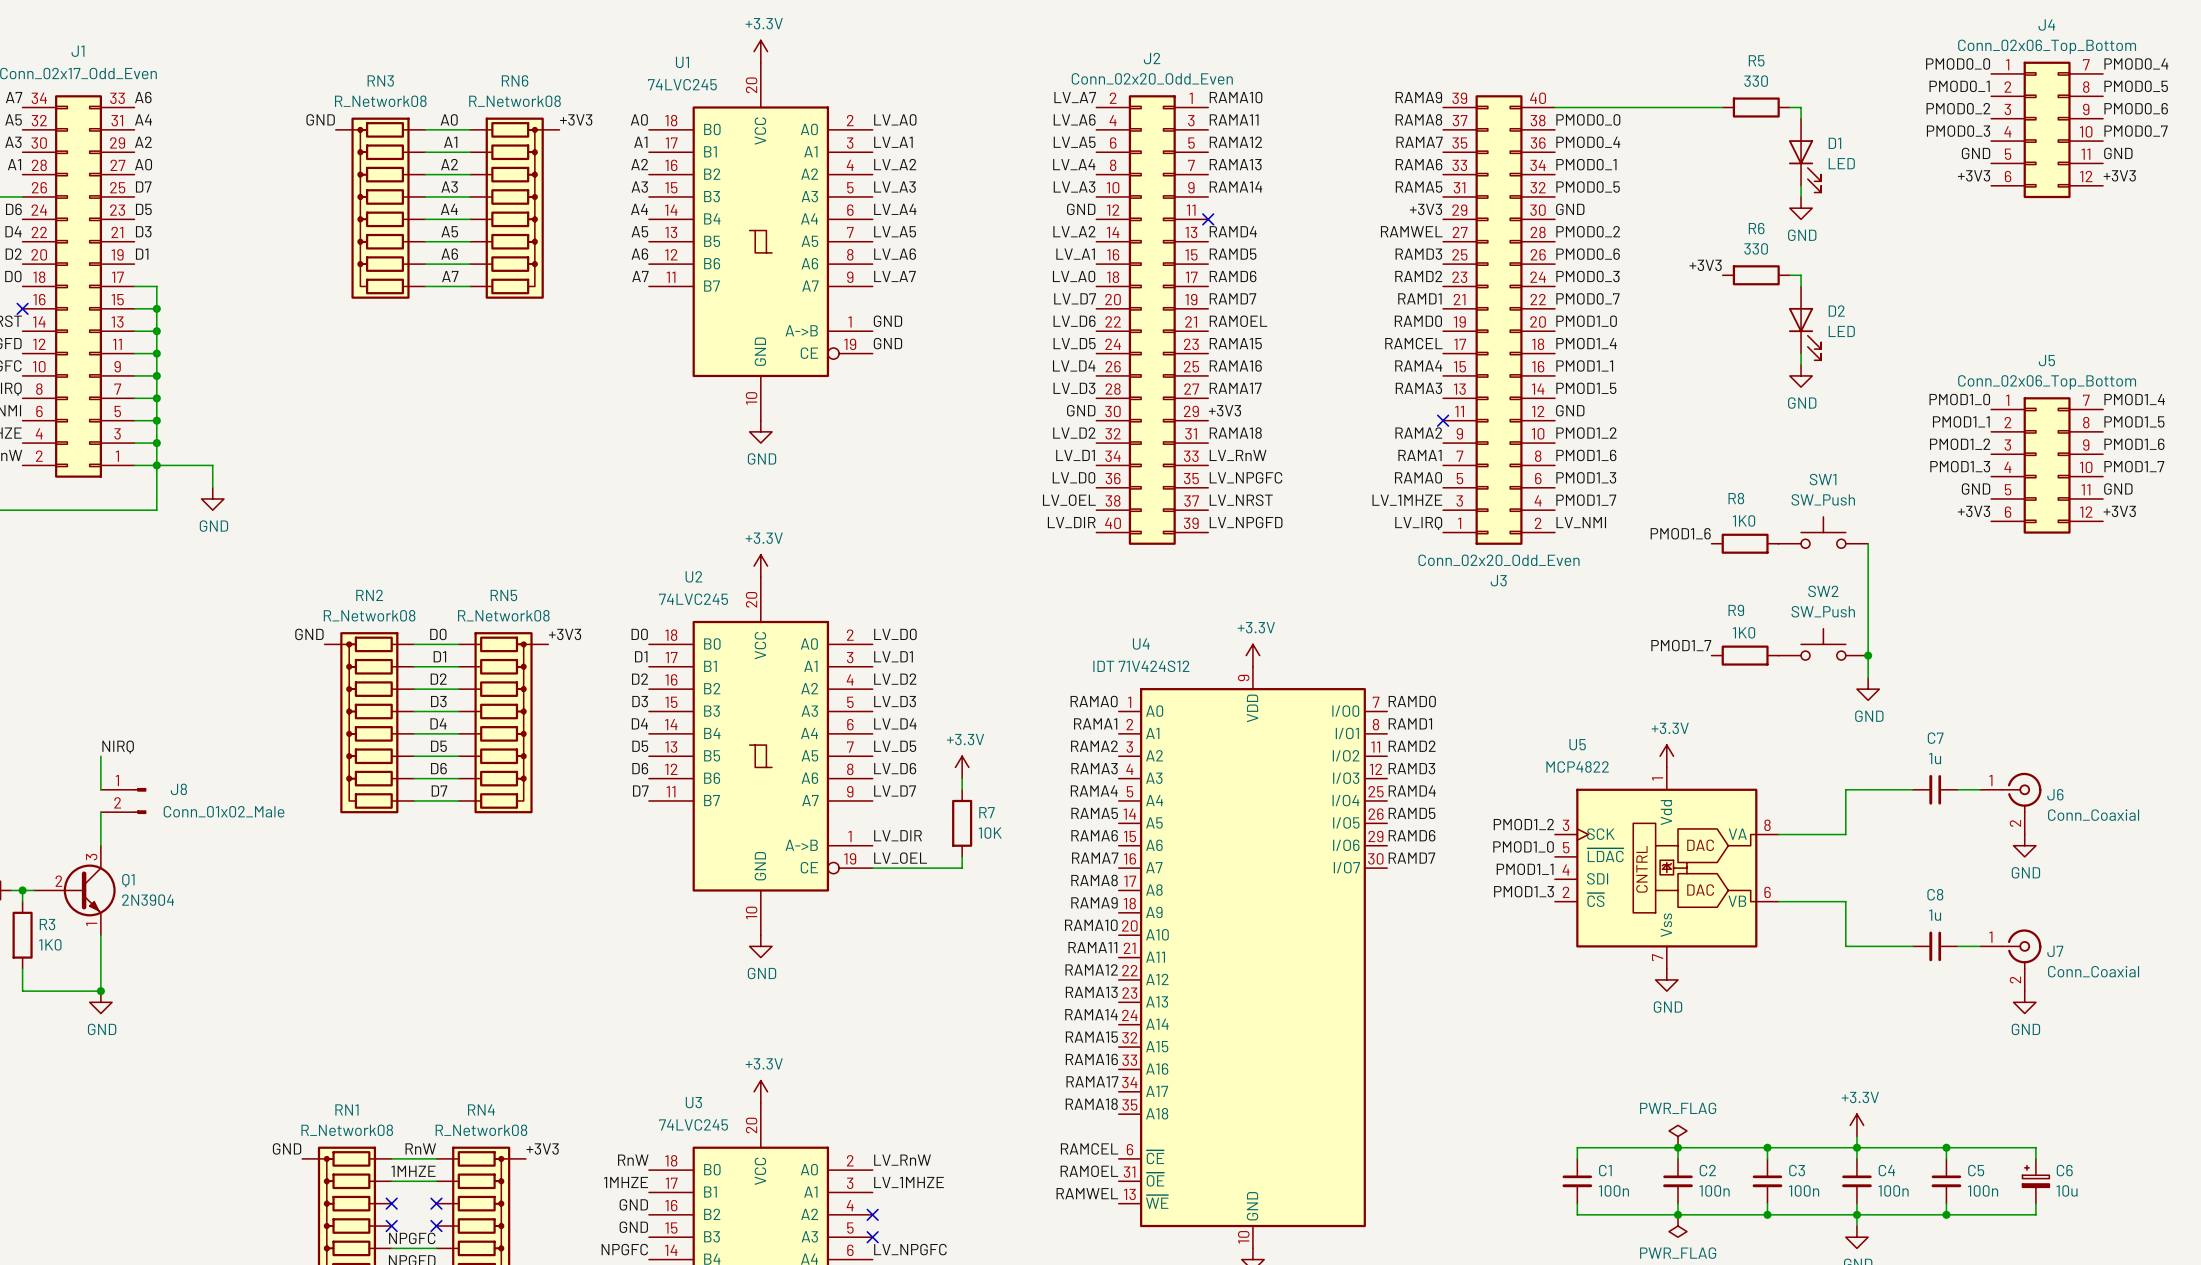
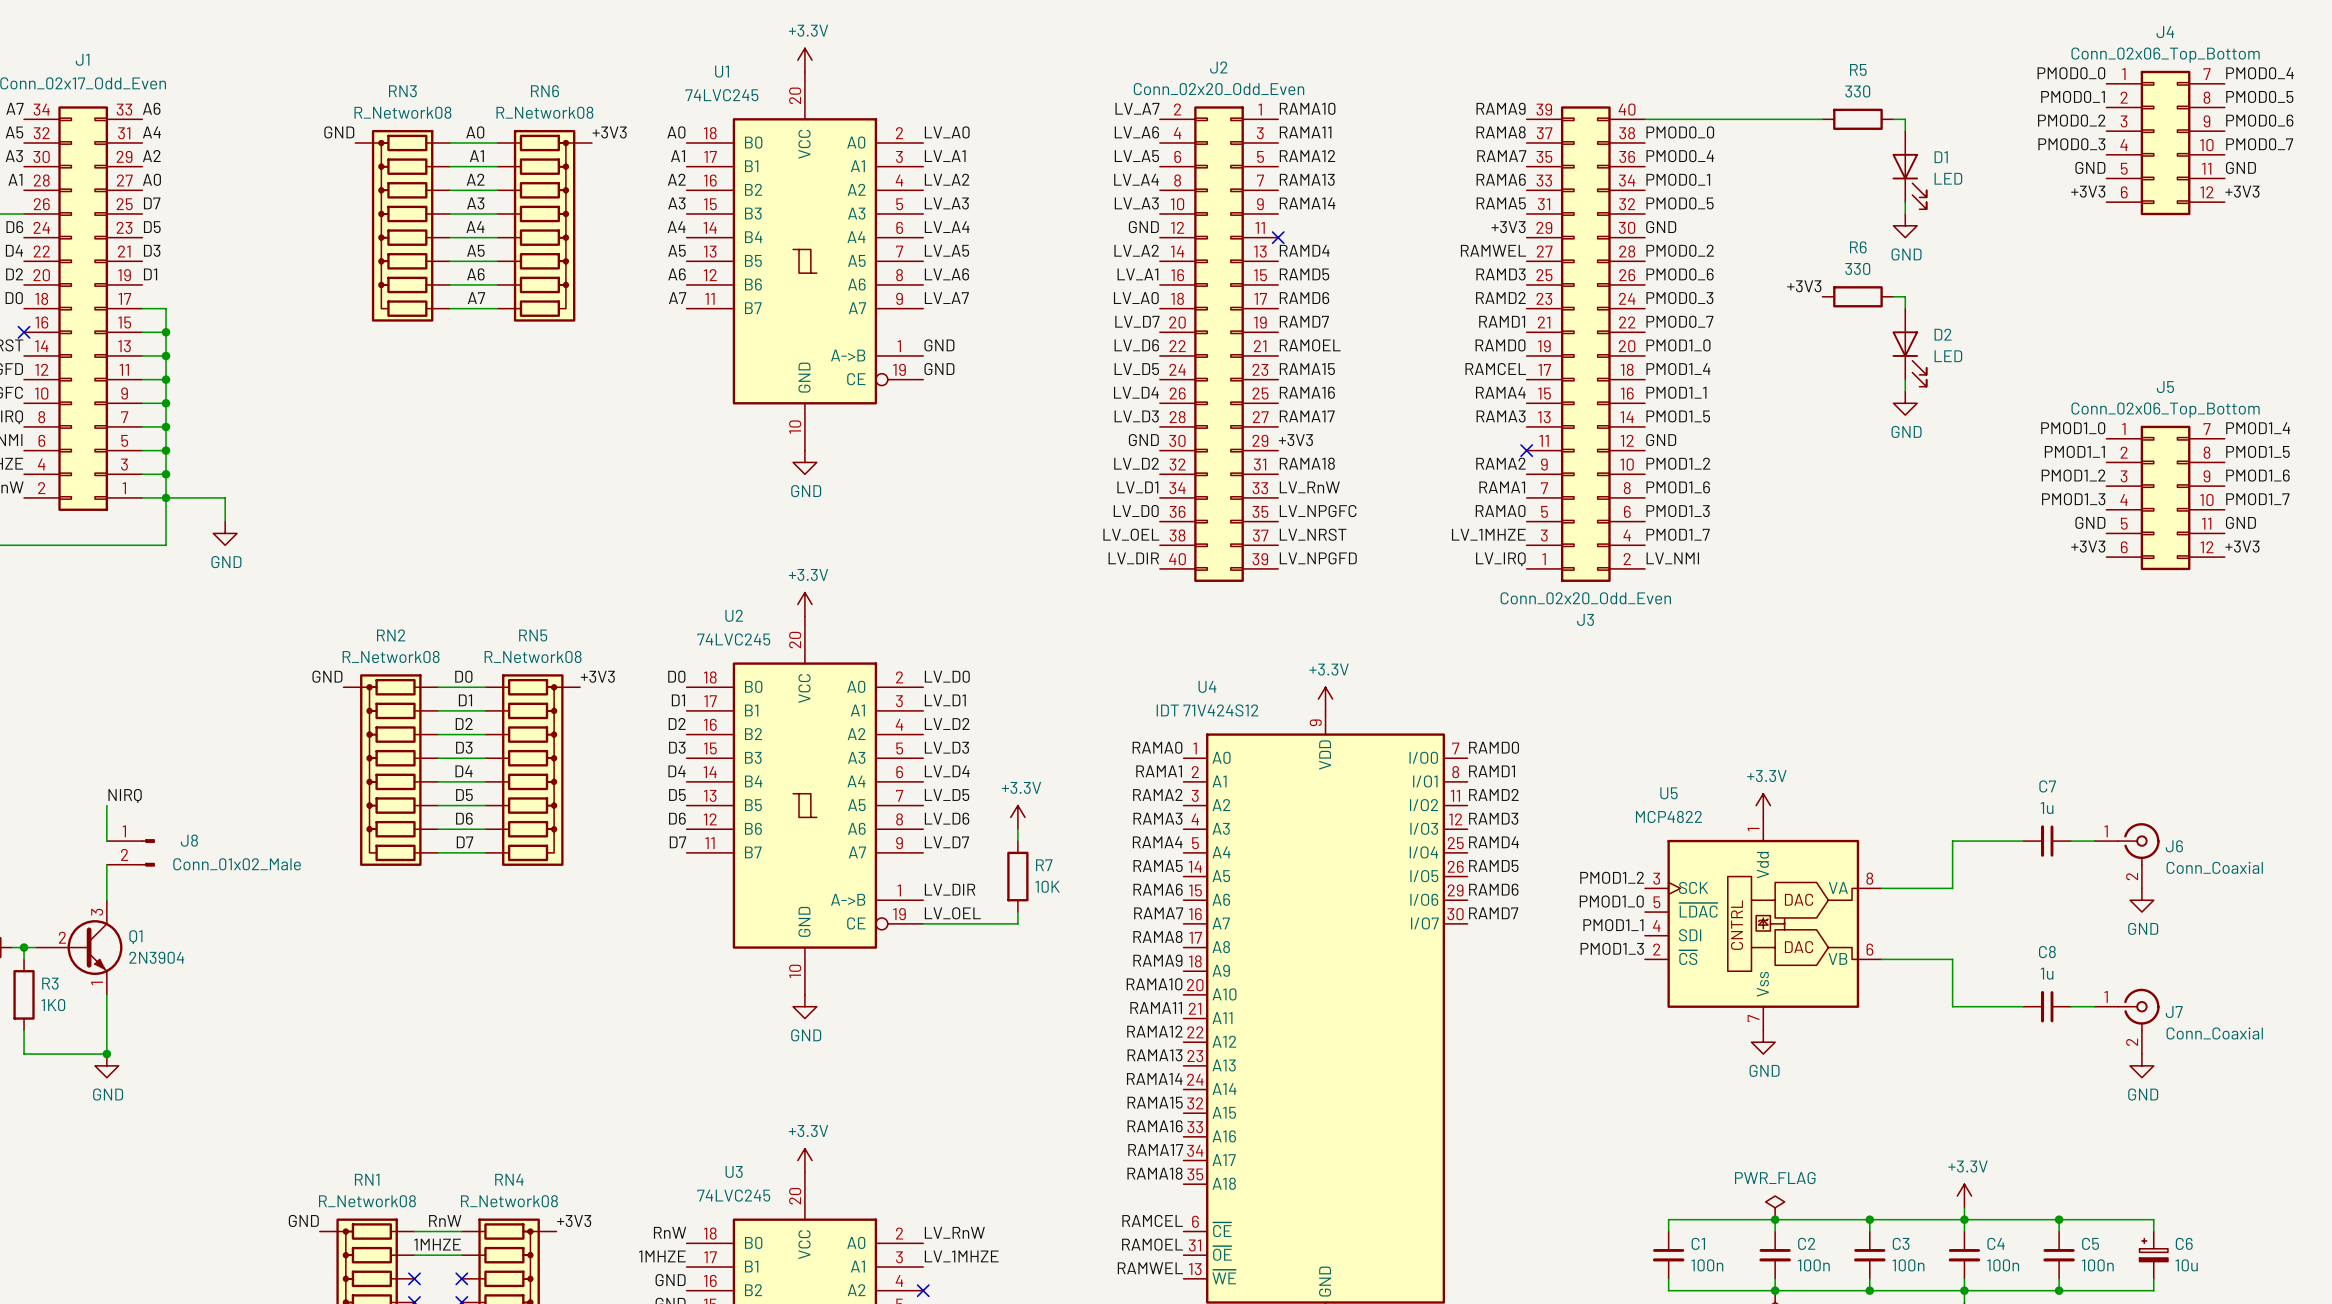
SW1: SW_Push (1823, 532) -> none
label: PMOD1_6 (1680, 533) -> none
R8: 1K0 (1745, 543) -> none
wire: (1868, 543) (1868, 677) -> none
SW2: SW_Push (1823, 644) -> none
label: PMOD1_7 (1681, 645) -> none
R9: 1K0 (1745, 655) -> none
junction: (1868, 655) -> none
power symbol: GND (1868, 689) -> none

